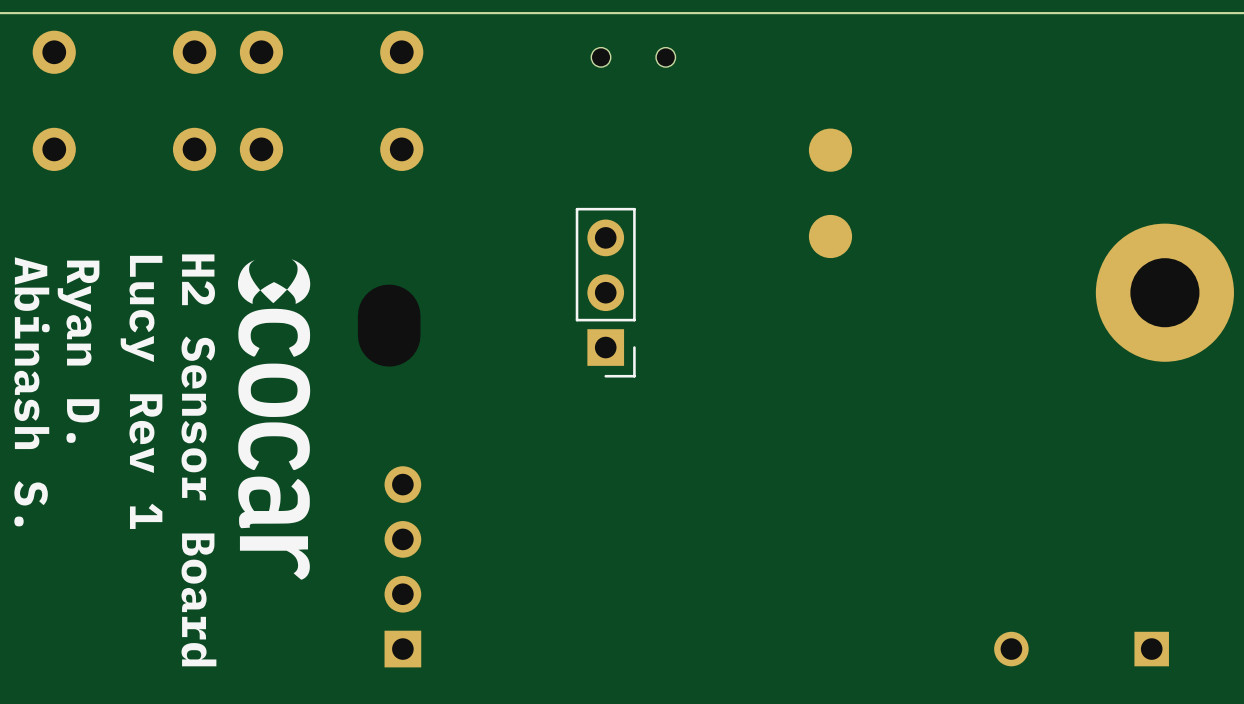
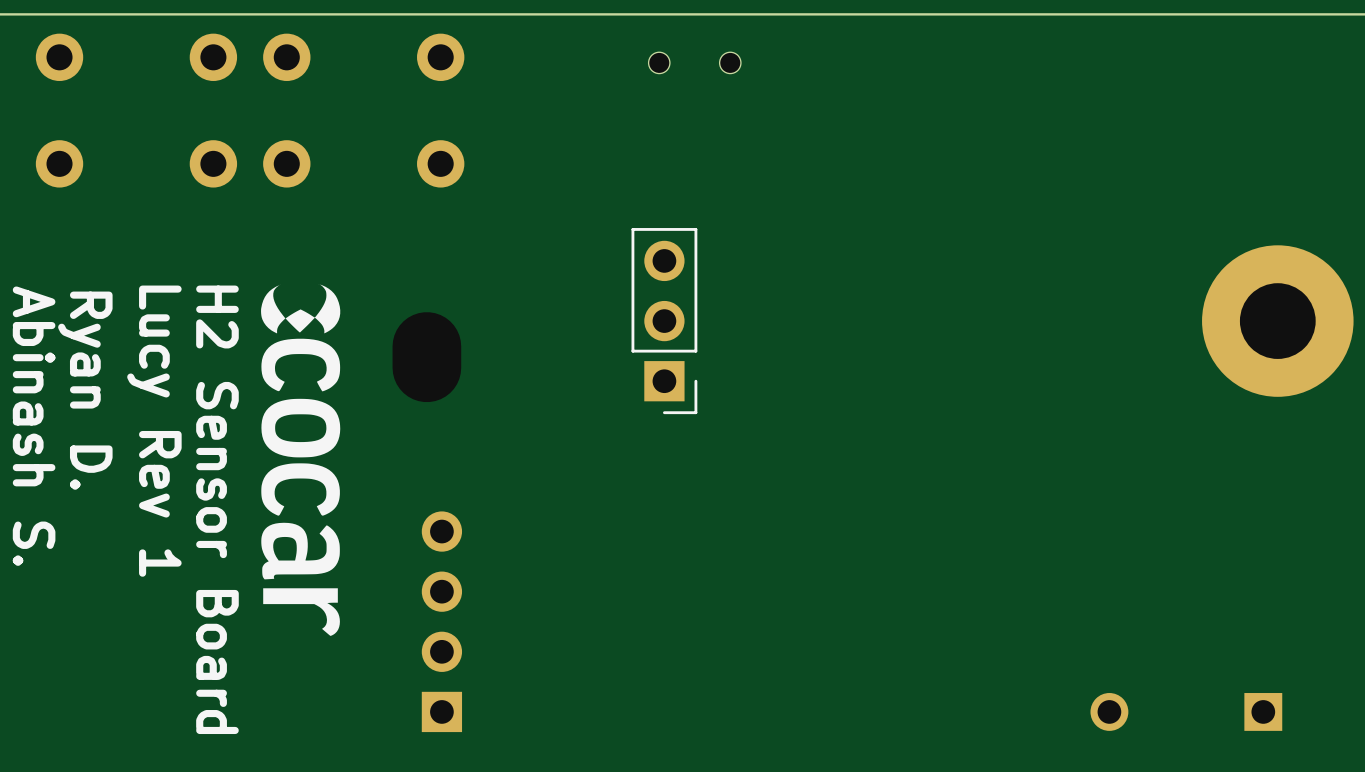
part: (830, 193) -> none

